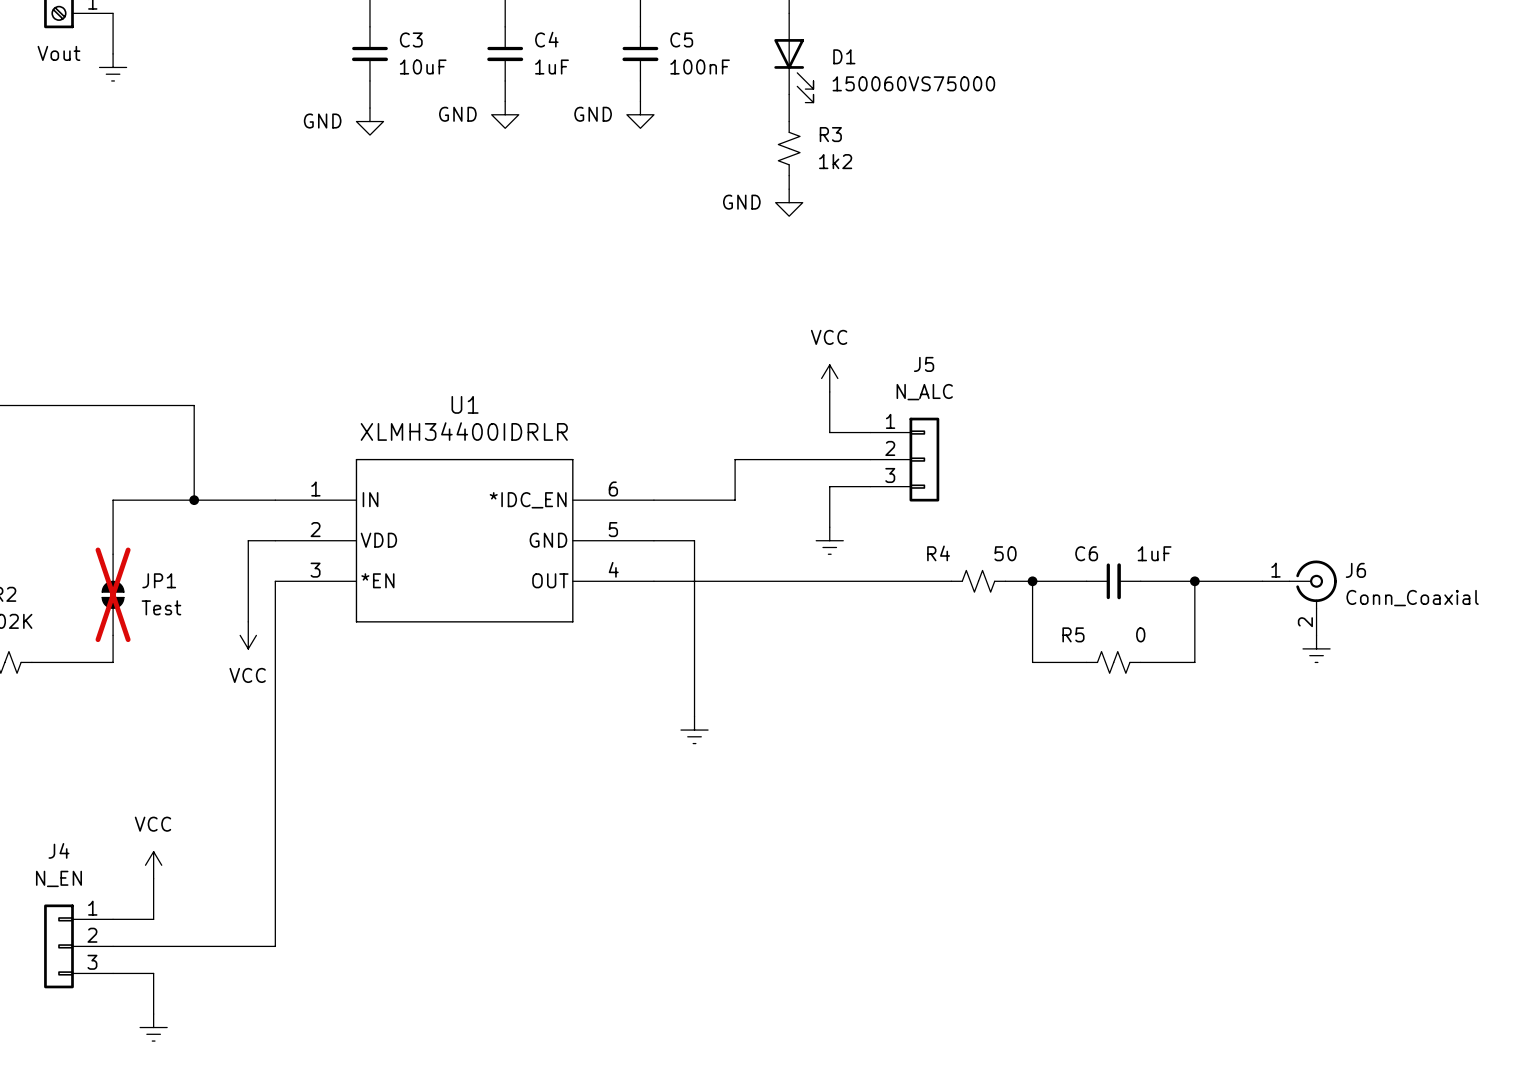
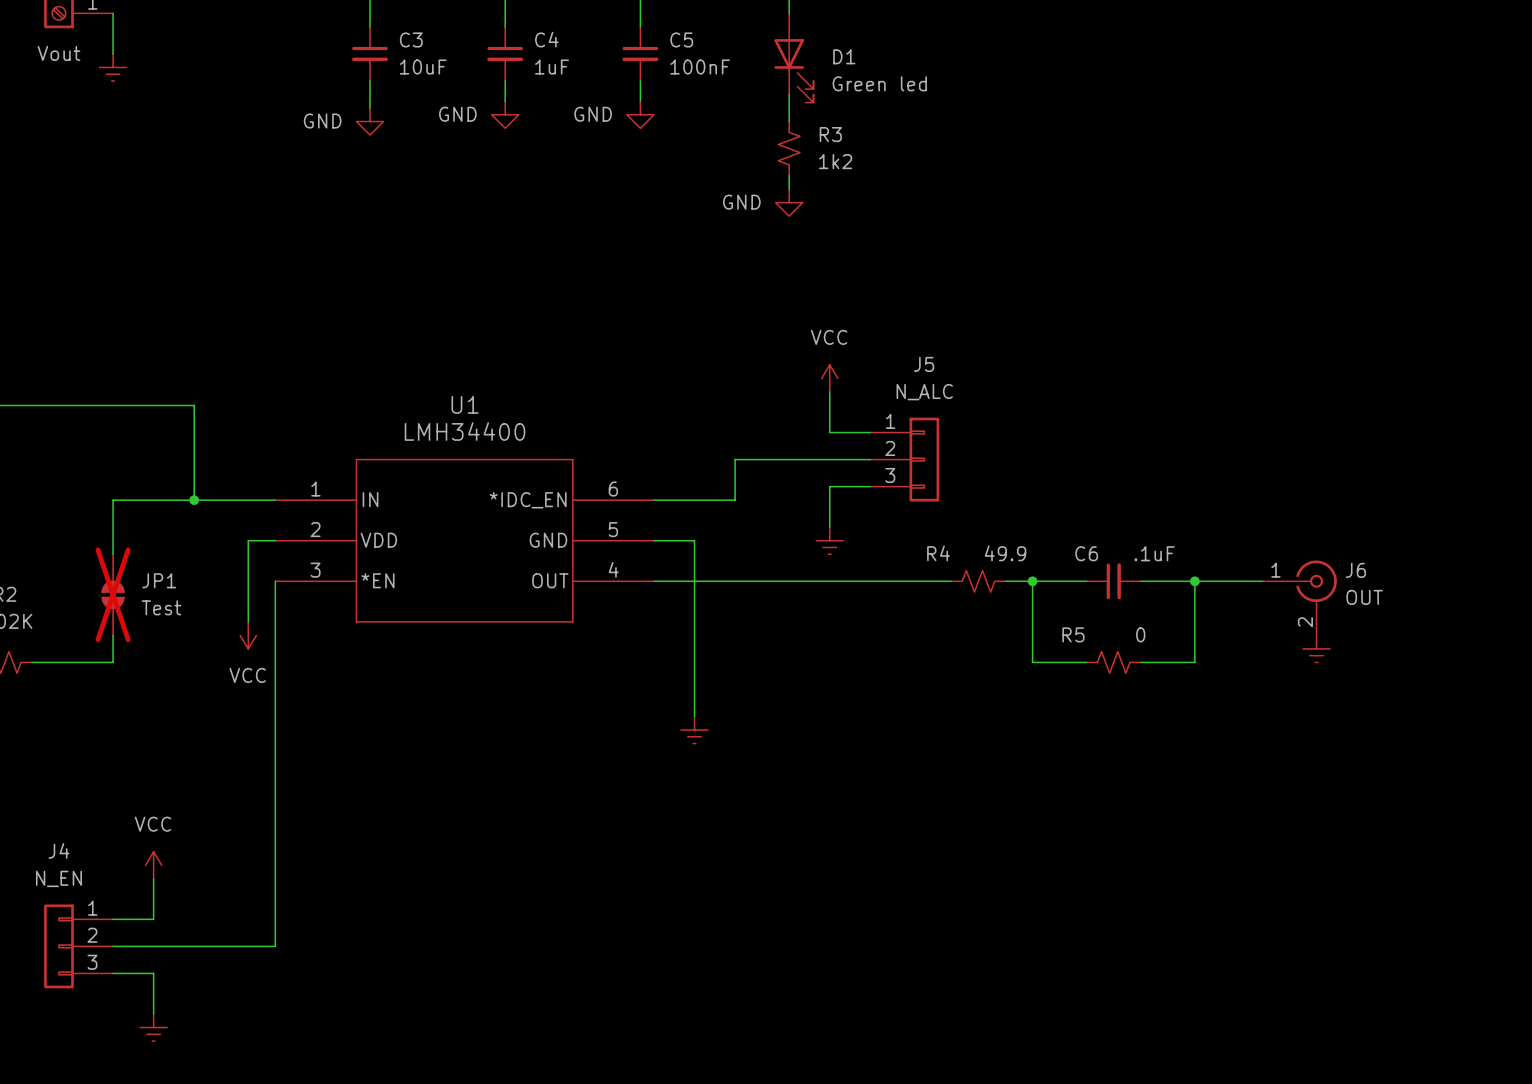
D1 value: 150060VS75000 (913, 83) -> Green led (879, 83)
U1 value: XLMH34400IDRLR (464, 431) -> LMH34400 (465, 431)
R4 value: 50 (1005, 553) -> 49.9 (1005, 553)
C6 value: 1uF (1154, 553) -> .1uF (1154, 553)
J6 value: Conn_Coaxial (1412, 598) -> OUT (1364, 597)

